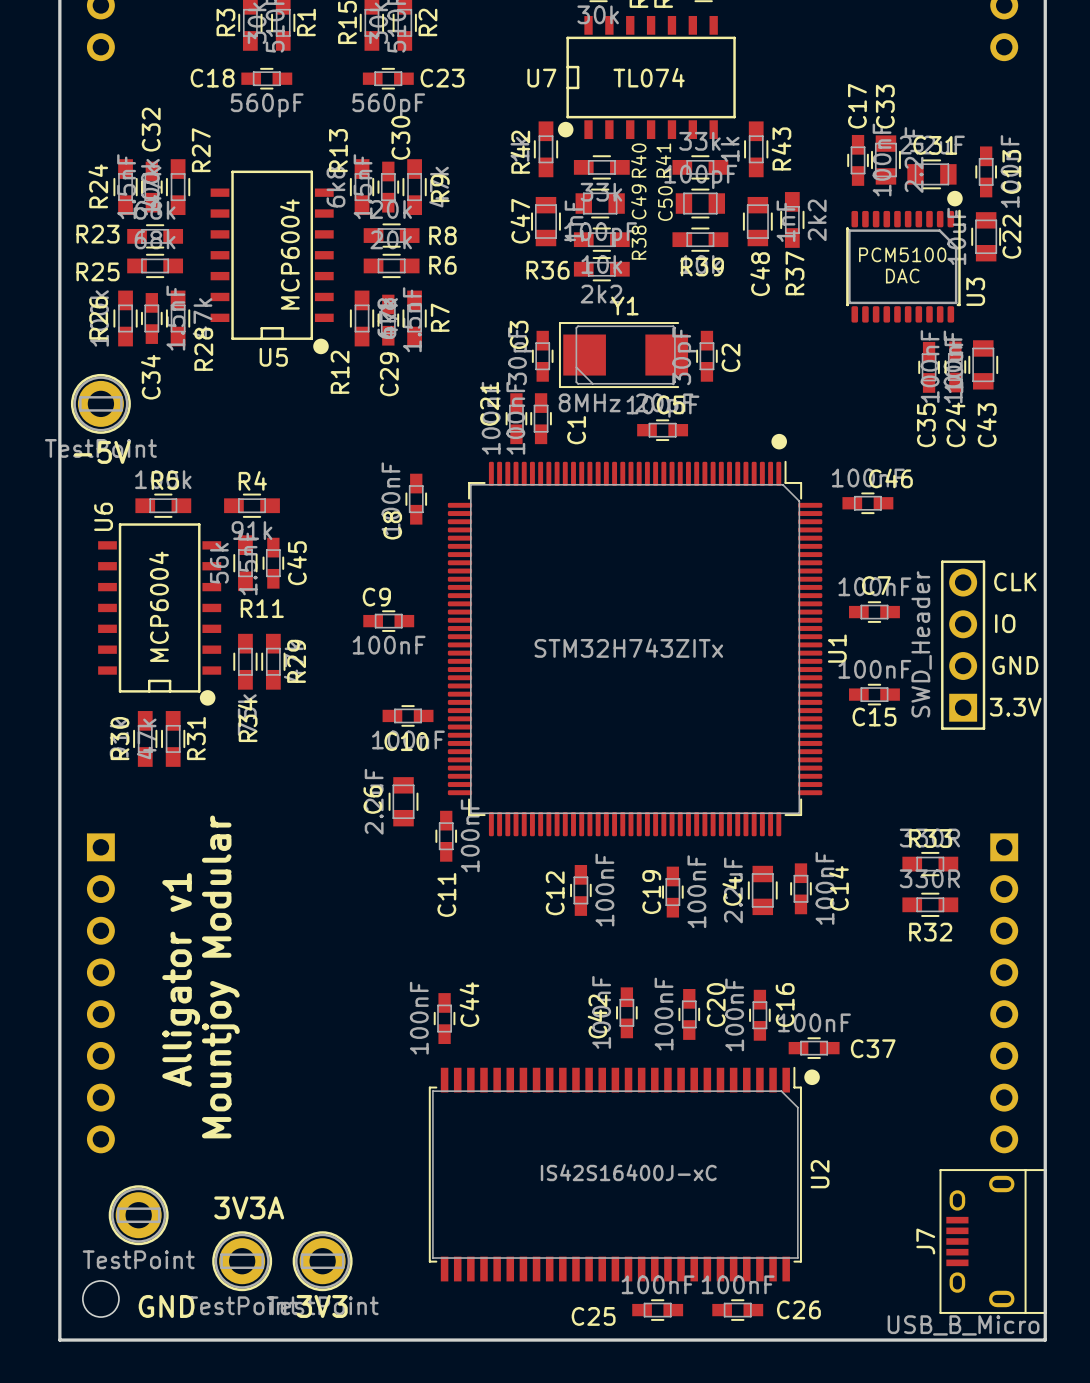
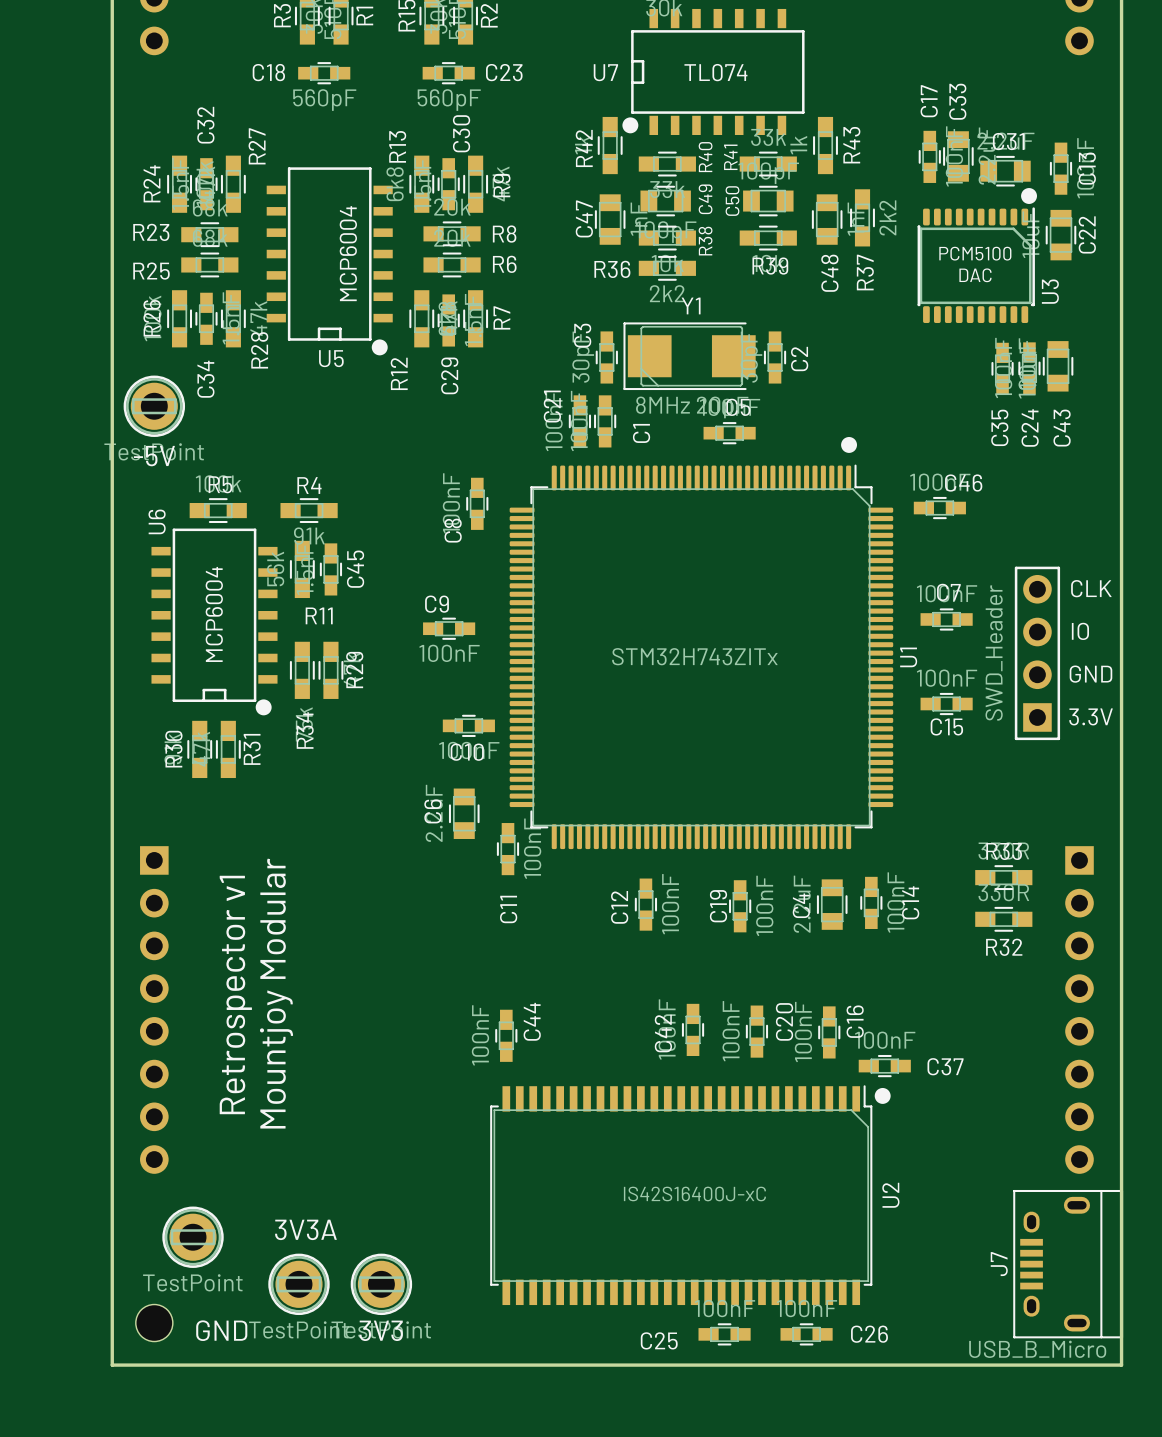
text: Alligator v1 (181, 979) -> Retrospector v1 (235, 994)

